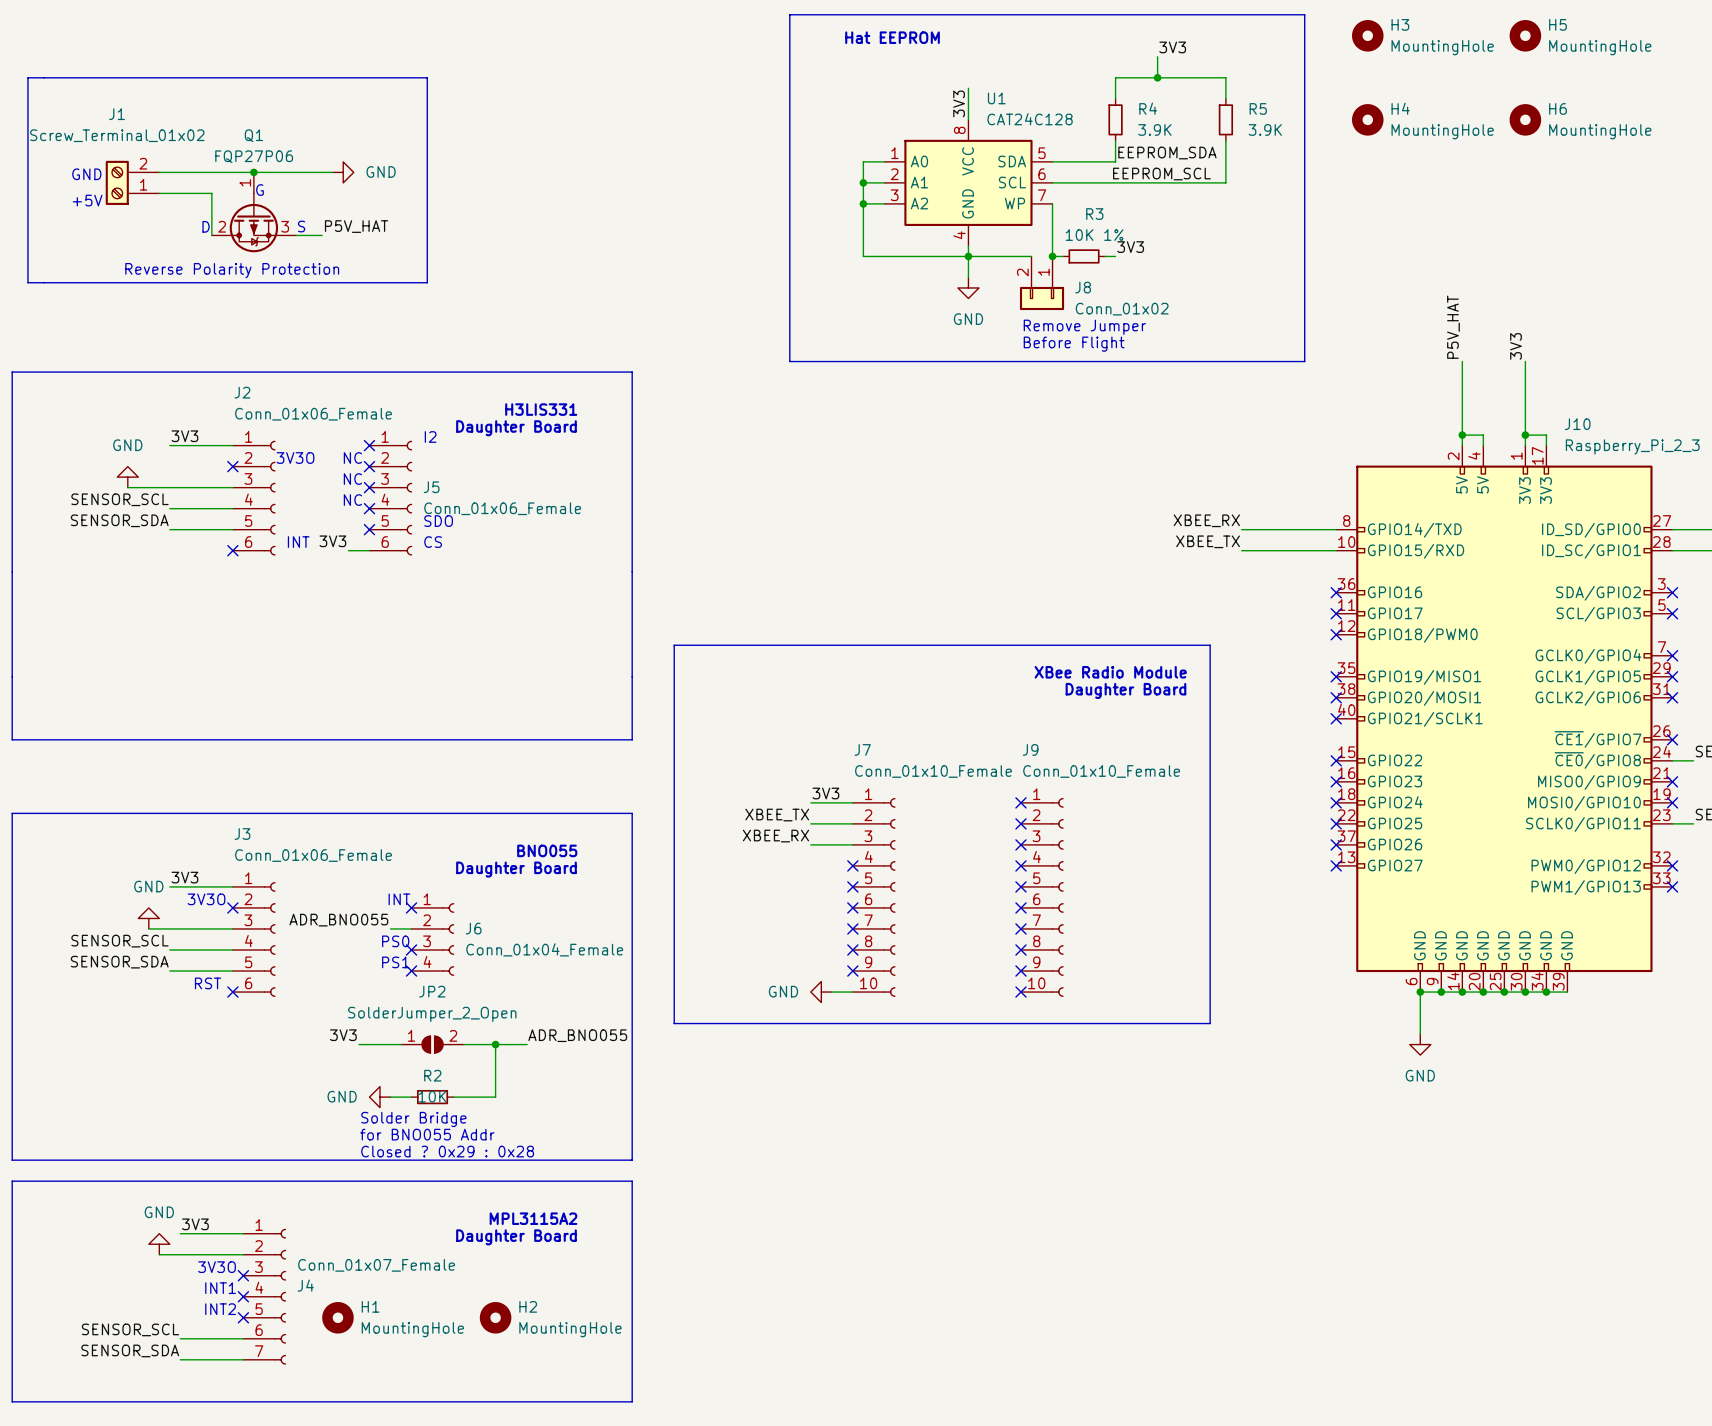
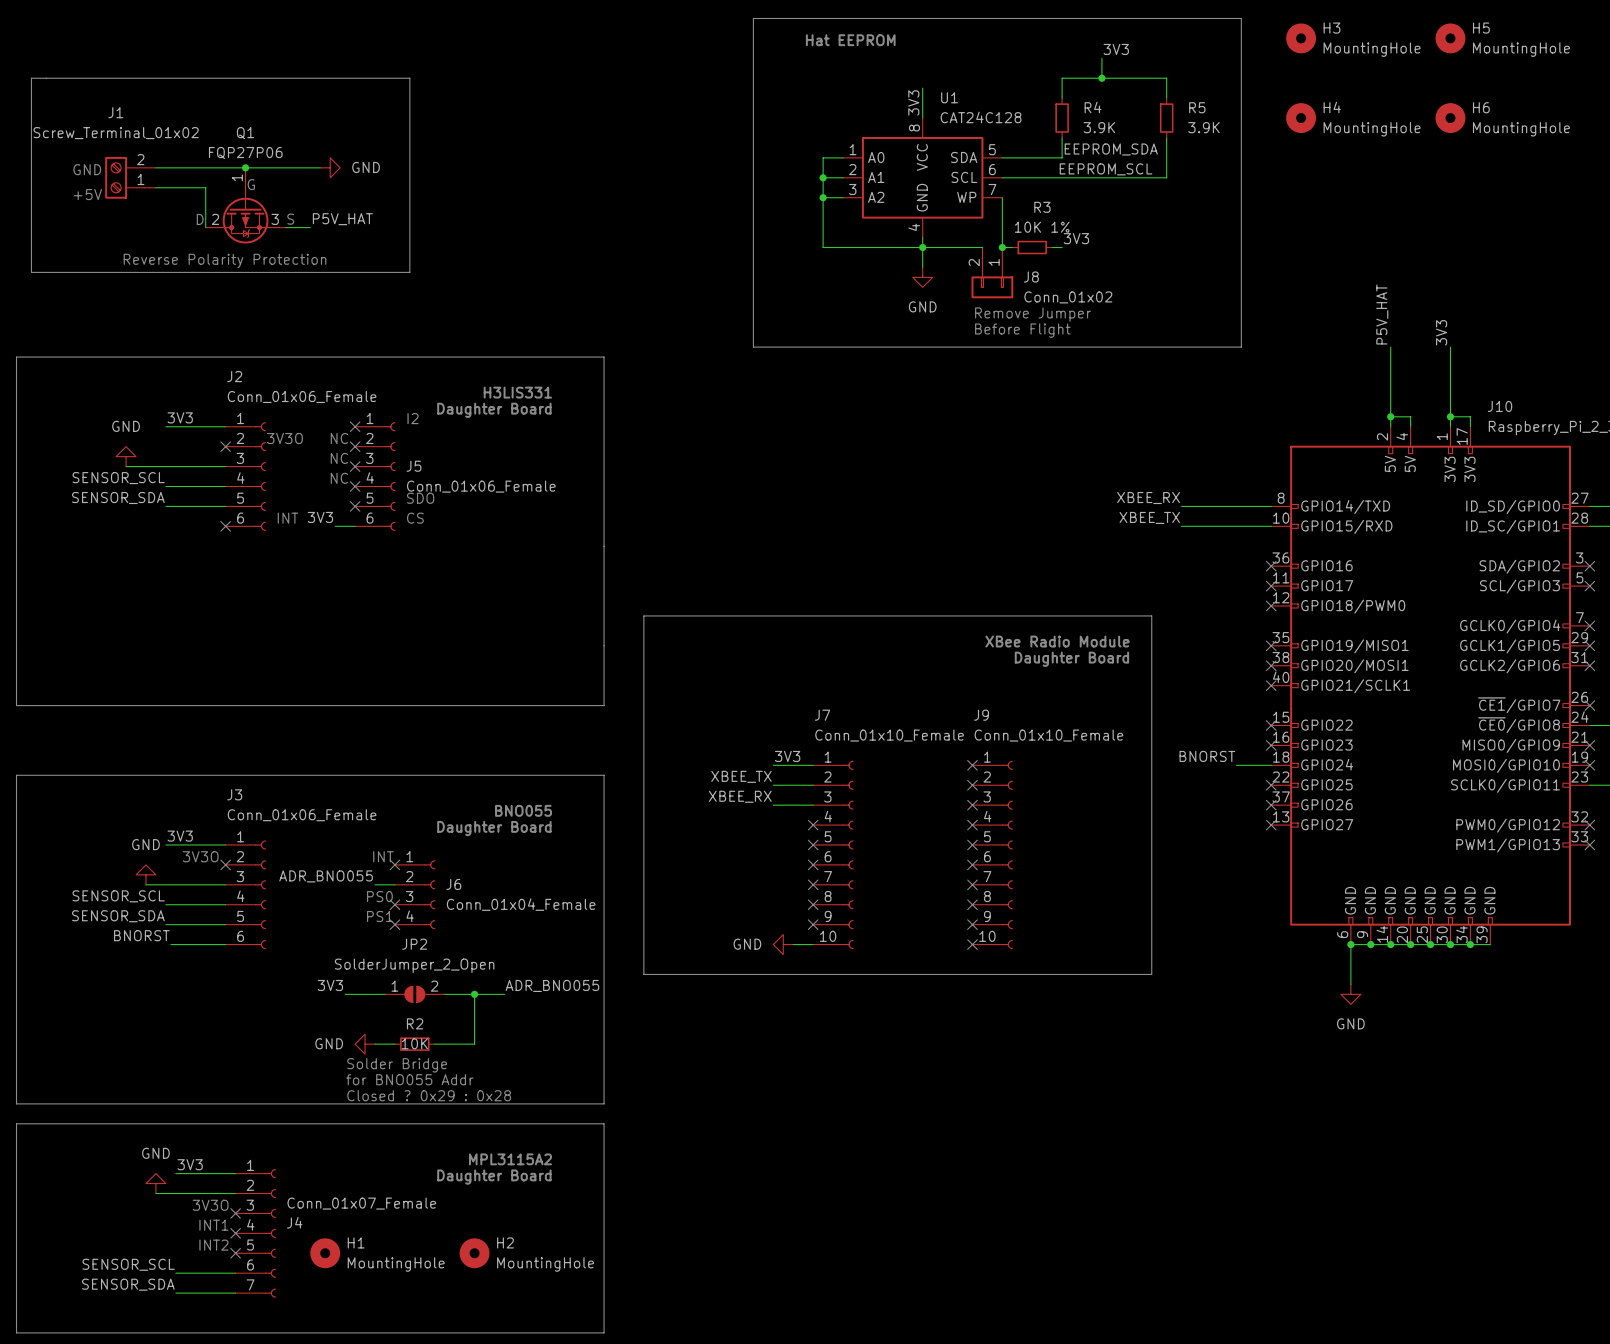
label: none -> BNORST (1207, 756)
wire: none -> (1236, 765) (1271, 765)
no-connect mark: (1336, 802) -> none
label: none -> BNORST (141, 935)
text: RST (208, 983) -> none
wire: none -> (170, 944) (225, 944)
no-connect mark: (232, 992) -> none

